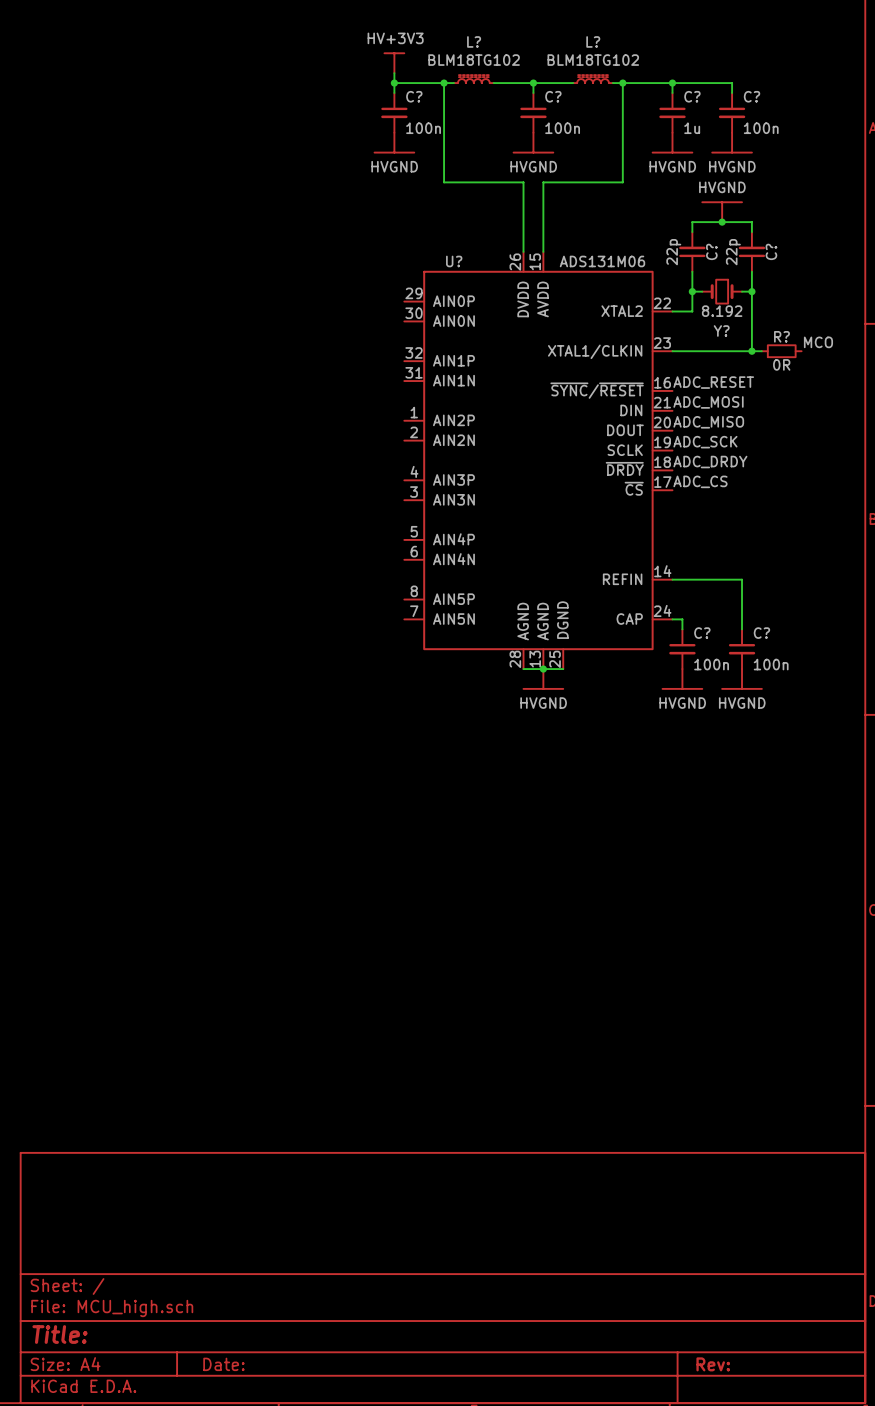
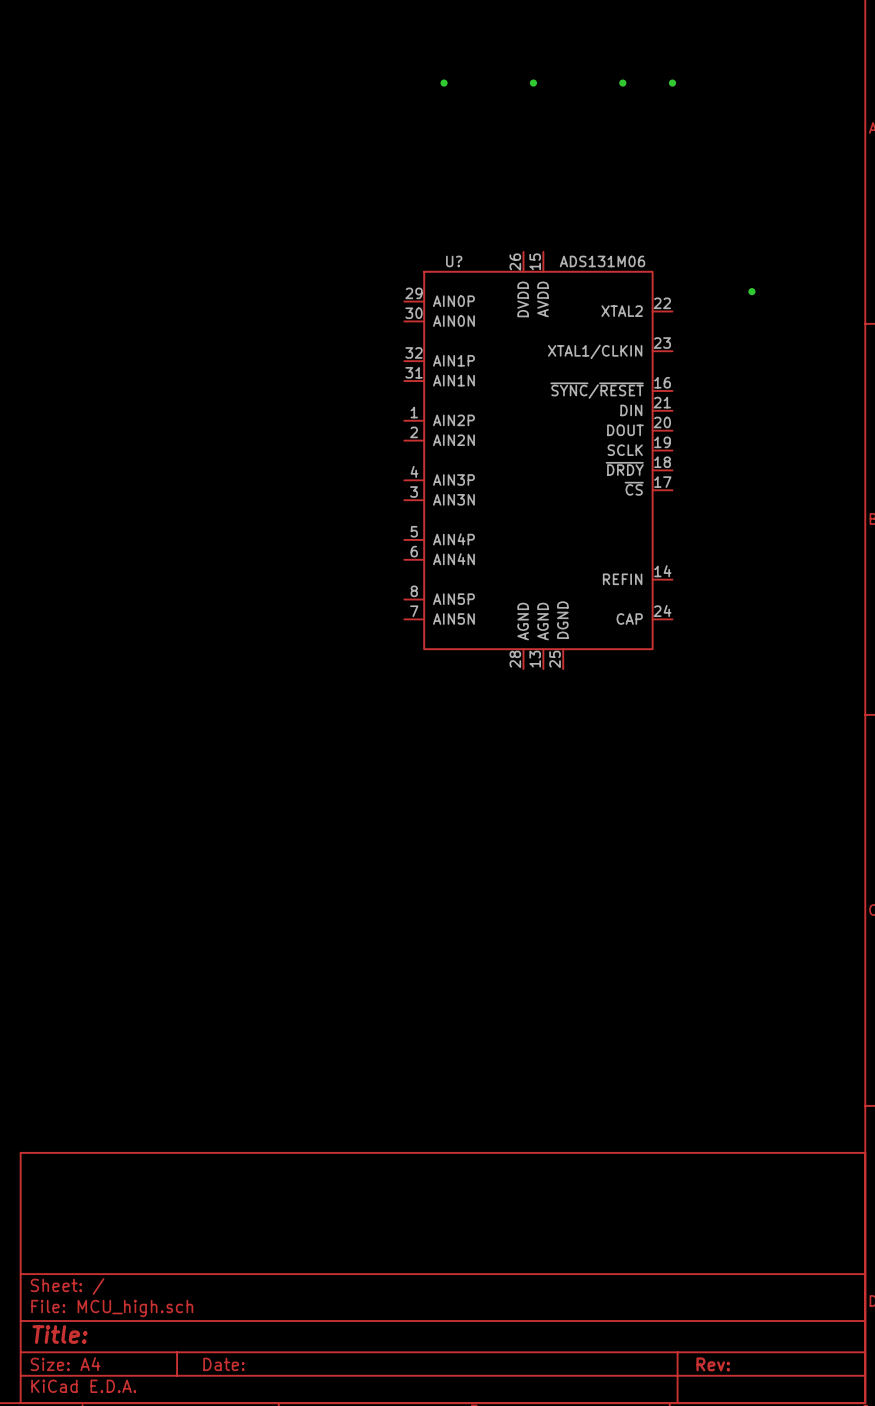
power symbol: HV+3V3 (394, 63) -> none
wire: (394, 73) (394, 93) -> none
L?: BLM18TG102 (473, 79) -> none
L?: BLM18TG102 (593, 79) -> none
wire: (394, 83) (453, 83) -> none
junction: (394, 83) -> none
wire: (444, 83) (444, 182) (523, 182) (523, 251) -> none
wire: (493, 83) (573, 83) -> none
wire: (533, 83) (533, 93) -> none
wire: (612, 83) (732, 83) (732, 93) -> none
wire: (622, 83) (622, 182) (543, 182) (543, 251) -> none
wire: (672, 83) (672, 93) -> none
C?: 100n (394, 112) -> none
C?: 100n (533, 112) -> none
C?: 1u (672, 112) -> none
C?: 100n (732, 112) -> none
power symbol: HVGND (394, 142) -> none
power symbol: HVGND (533, 142) -> none
power symbol: HVGND (672, 142) -> none
power symbol: HVGND (732, 142) -> none
power symbol: HVGND (722, 212) -> none
junction: (722, 222) -> none
wire: (692, 232) (692, 222) (751, 222) (751, 232) -> none
C?: 22p (692, 251) -> none
C?: 22p (751, 251) -> none
wire: (692, 271) (692, 311) (672, 311) -> none
wire: (751, 271) (751, 351) -> none
wire: (692, 291) (702, 291) -> none
junction: (692, 291) -> none
Y?: 8.192 (722, 291) -> none
wire: (742, 291) (751, 291) -> none
label: MCO (818, 342) -> none
wire: (672, 351) (761, 351) -> none
junction: (751, 351) -> none
R?: 0R (781, 351) -> none
label: ADC_RESET (713, 382) -> none
label: ADC_MOSI (708, 402) -> none
label: ADC_MISO (708, 422) -> none
label: ADC_SCK (705, 442) -> none
label: ADC_DRDY (710, 462) -> none
label: ADC_CS (700, 481) -> none
wire: (672, 579) (742, 579) (742, 629) -> none
wire: (672, 619) (682, 619) (682, 629) -> none
C?: 100n (682, 649) -> none
C?: 100n (742, 649) -> none
wire: (523, 669) (563, 669) -> none
junction: (543, 669) -> none
power symbol: HVGND (543, 678) -> none
power symbol: HVGND (682, 678) -> none
power symbol: HVGND (742, 678) -> none

